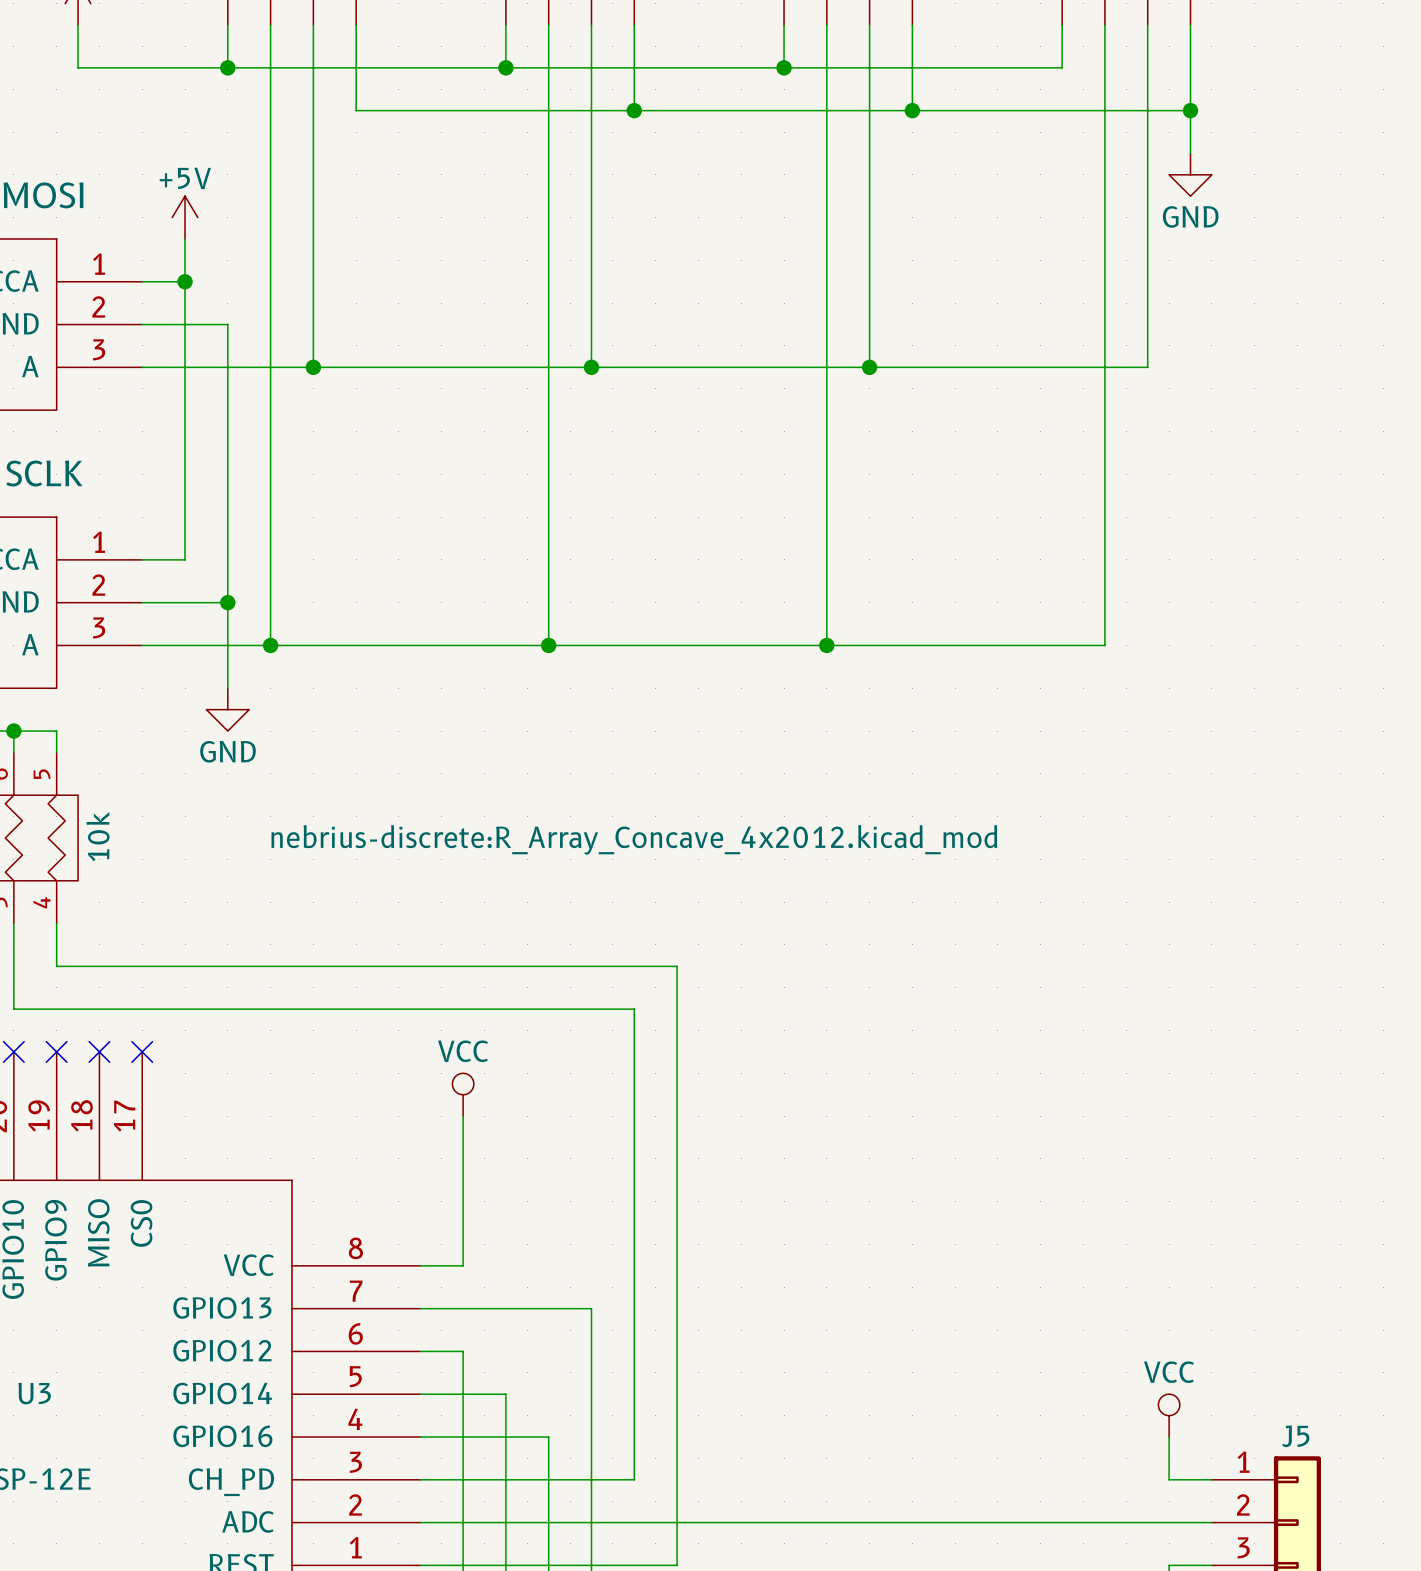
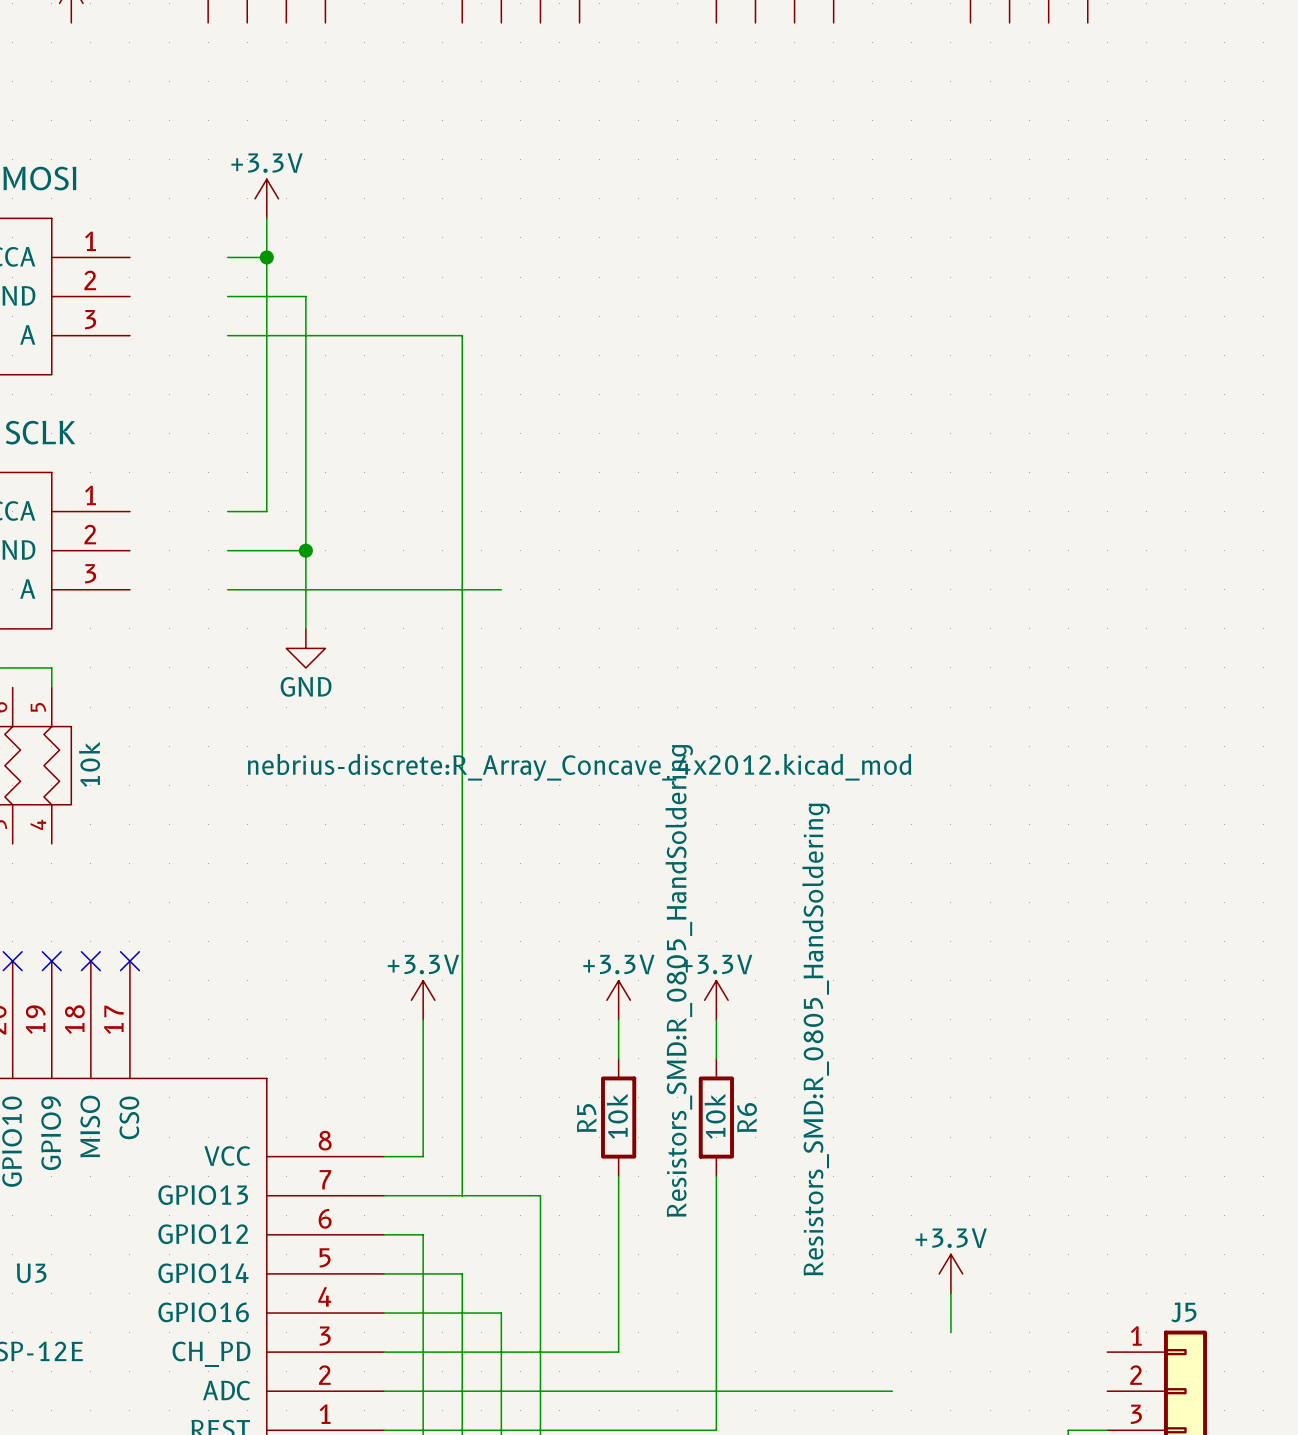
wire: (78, 25) (78, 67) (1062, 67) (1062, 25) -> none
wire: (227, 25) (227, 67) -> none
wire: (270, 25) (270, 645) -> none
wire: (313, 25) (313, 367) -> none
wire: (356, 25) (356, 110) (1190, 110) -> none
wire: (505, 25) (505, 67) -> none
wire: (548, 25) (548, 645) (1104, 645) (1104, 25) -> none
wire: (591, 25) (591, 367) -> none
wire: (634, 25) (634, 110) -> none
wire: (784, 25) (784, 67) -> none
wire: (826, 25) (826, 645) -> none
wire: (869, 25) (869, 367) -> none
wire: (912, 25) (912, 110) -> none
wire: (1147, 25) (1147, 367) (505, 367) -> (462, 1195) (462, 335)
wire: (1190, 25) (1190, 153) -> none
junction: (227, 67) -> none
junction: (505, 67) -> none
junction: (784, 67) -> none
junction: (634, 110) -> none
junction: (912, 110) -> none
junction: (1190, 110) -> none
power symbol: GND (1190, 174) -> none
power symbol: +5V (185, 217) -> none
power symbol: none -> +3.3V (266, 198)
wire: (185, 238) (185, 559) (142, 559) -> (266, 218) (266, 511) (227, 511)
wire: (142, 281) (185, 281) -> (227, 257) (266, 257)
junction: (185, 281) -> none
junction: none -> (266, 257)
wire: (142, 324) (227, 324) (227, 688) -> (227, 296) (305, 296) (305, 628)
wire: (142, 367) (249, 367) -> none
junction: (313, 367) -> none
junction: (591, 367) -> none
junction: (869, 367) -> none
wire: (142, 602) (227, 602) -> (227, 550) (305, 550)
junction: (227, 602) -> none
junction: none -> (305, 550)
wire: (142, 645) (249, 645) -> none
junction: (270, 645) -> none
junction: (548, 645) -> none
junction: (826, 645) -> none
power symbol position: GND (227, 709) -> GND (305, 648)
wire: (13, 731) (13, 752) -> none
junction: (13, 731) -> none
wire: (13, 923) (13, 1009) (634, 1009) (634, 1479) -> none
wire: (56, 923) (56, 966) (677, 966) (677, 1116) -> none
power symbol: VCC (463, 1094) -> +3.3V (423, 1000)
power symbol: none -> +3.3V (618, 1000)
power symbol: none -> +3.3V (716, 1000)
wire: none -> (716, 1019) (716, 1058)
wire: (677, 1158) (677, 1287) -> none
R5: none -> 10k (618, 1117)
R6: none -> 10k (716, 1117)
wire: none -> (716, 1176) (716, 1430) (618, 1430)
power symbol: none -> +3.3V (950, 1273)
wire: none -> (950, 1293) (950, 1332)
power symbol: VCC (1169, 1415) -> none
wire: (1169, 1437) (1169, 1479) (1211, 1479) -> none
wire: (677, 1479) (677, 1565) -> (618, 1352) (579, 1352)
wire: (976, 1522) (1211, 1522) -> none

